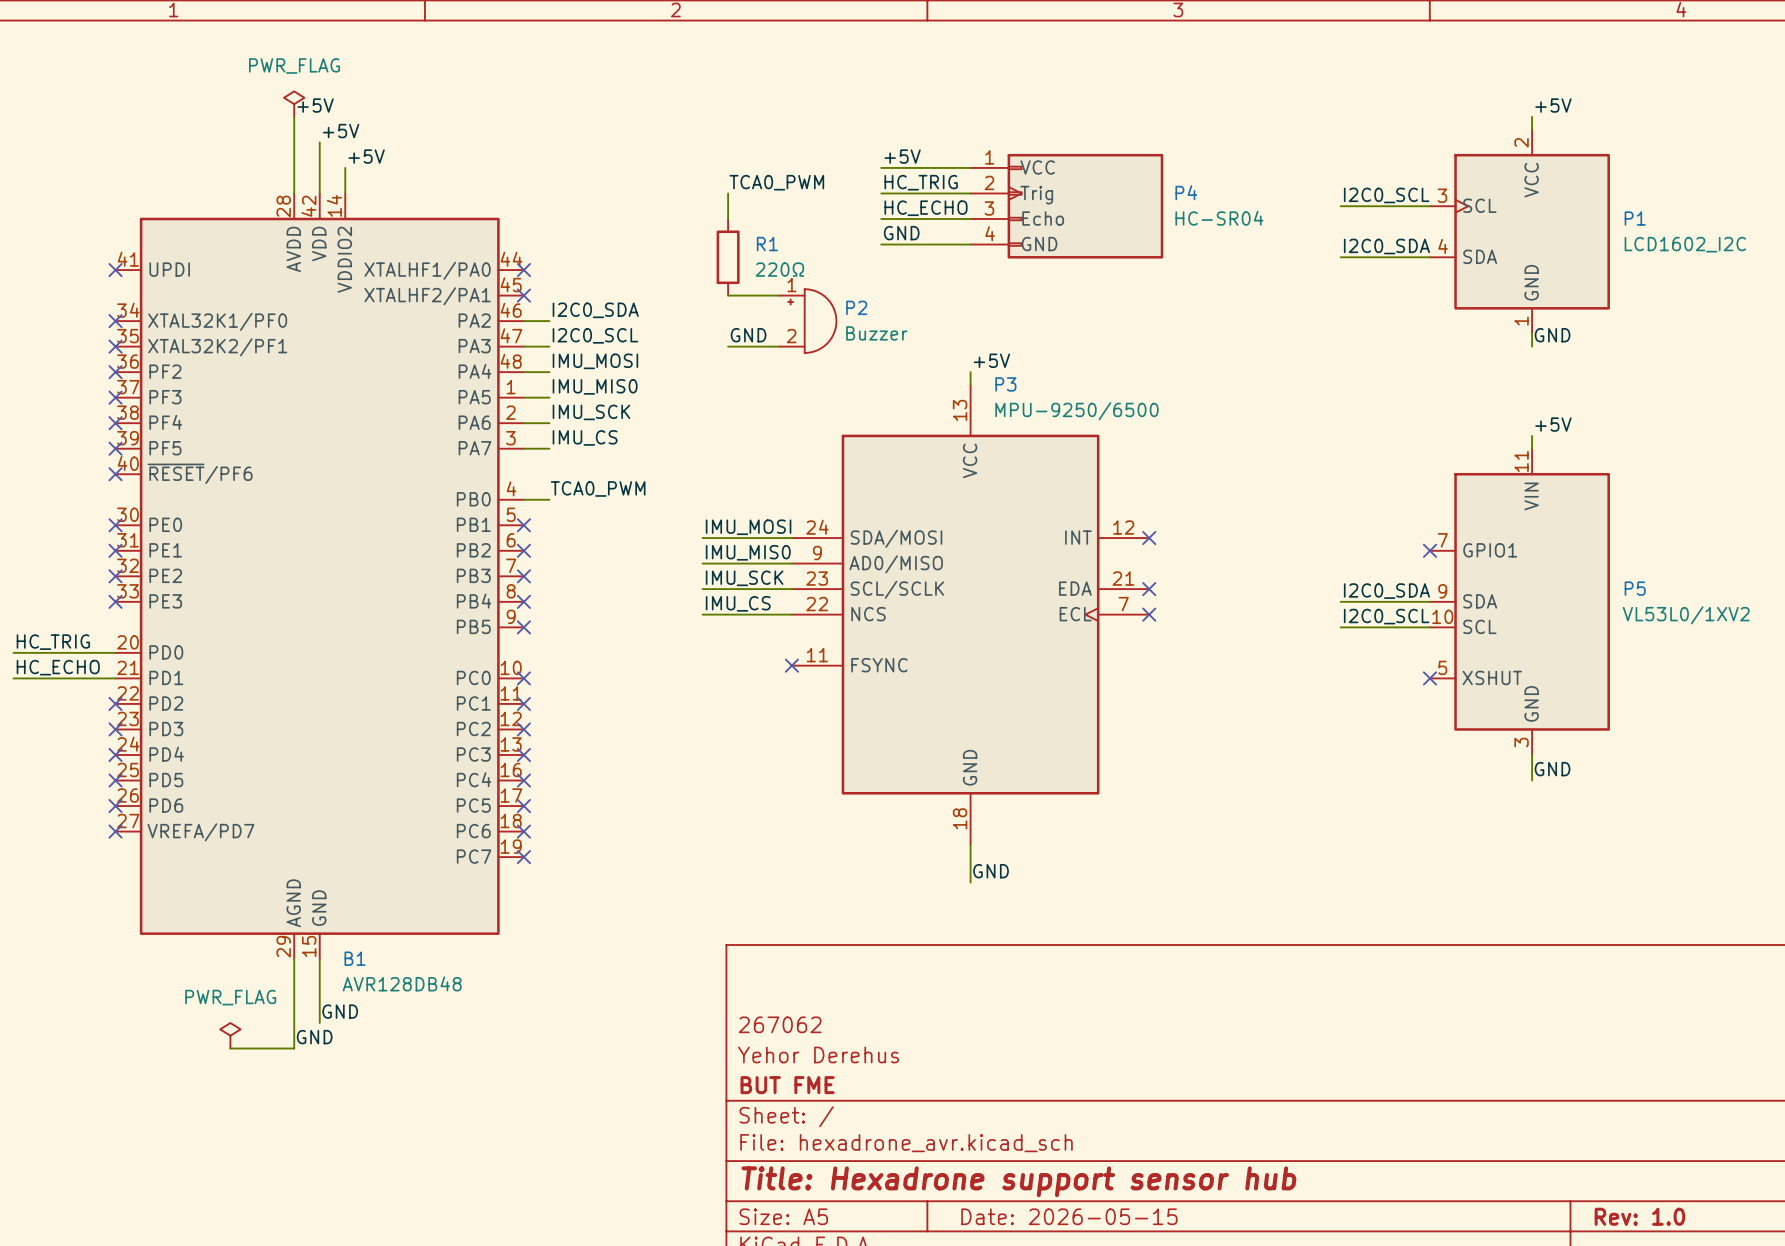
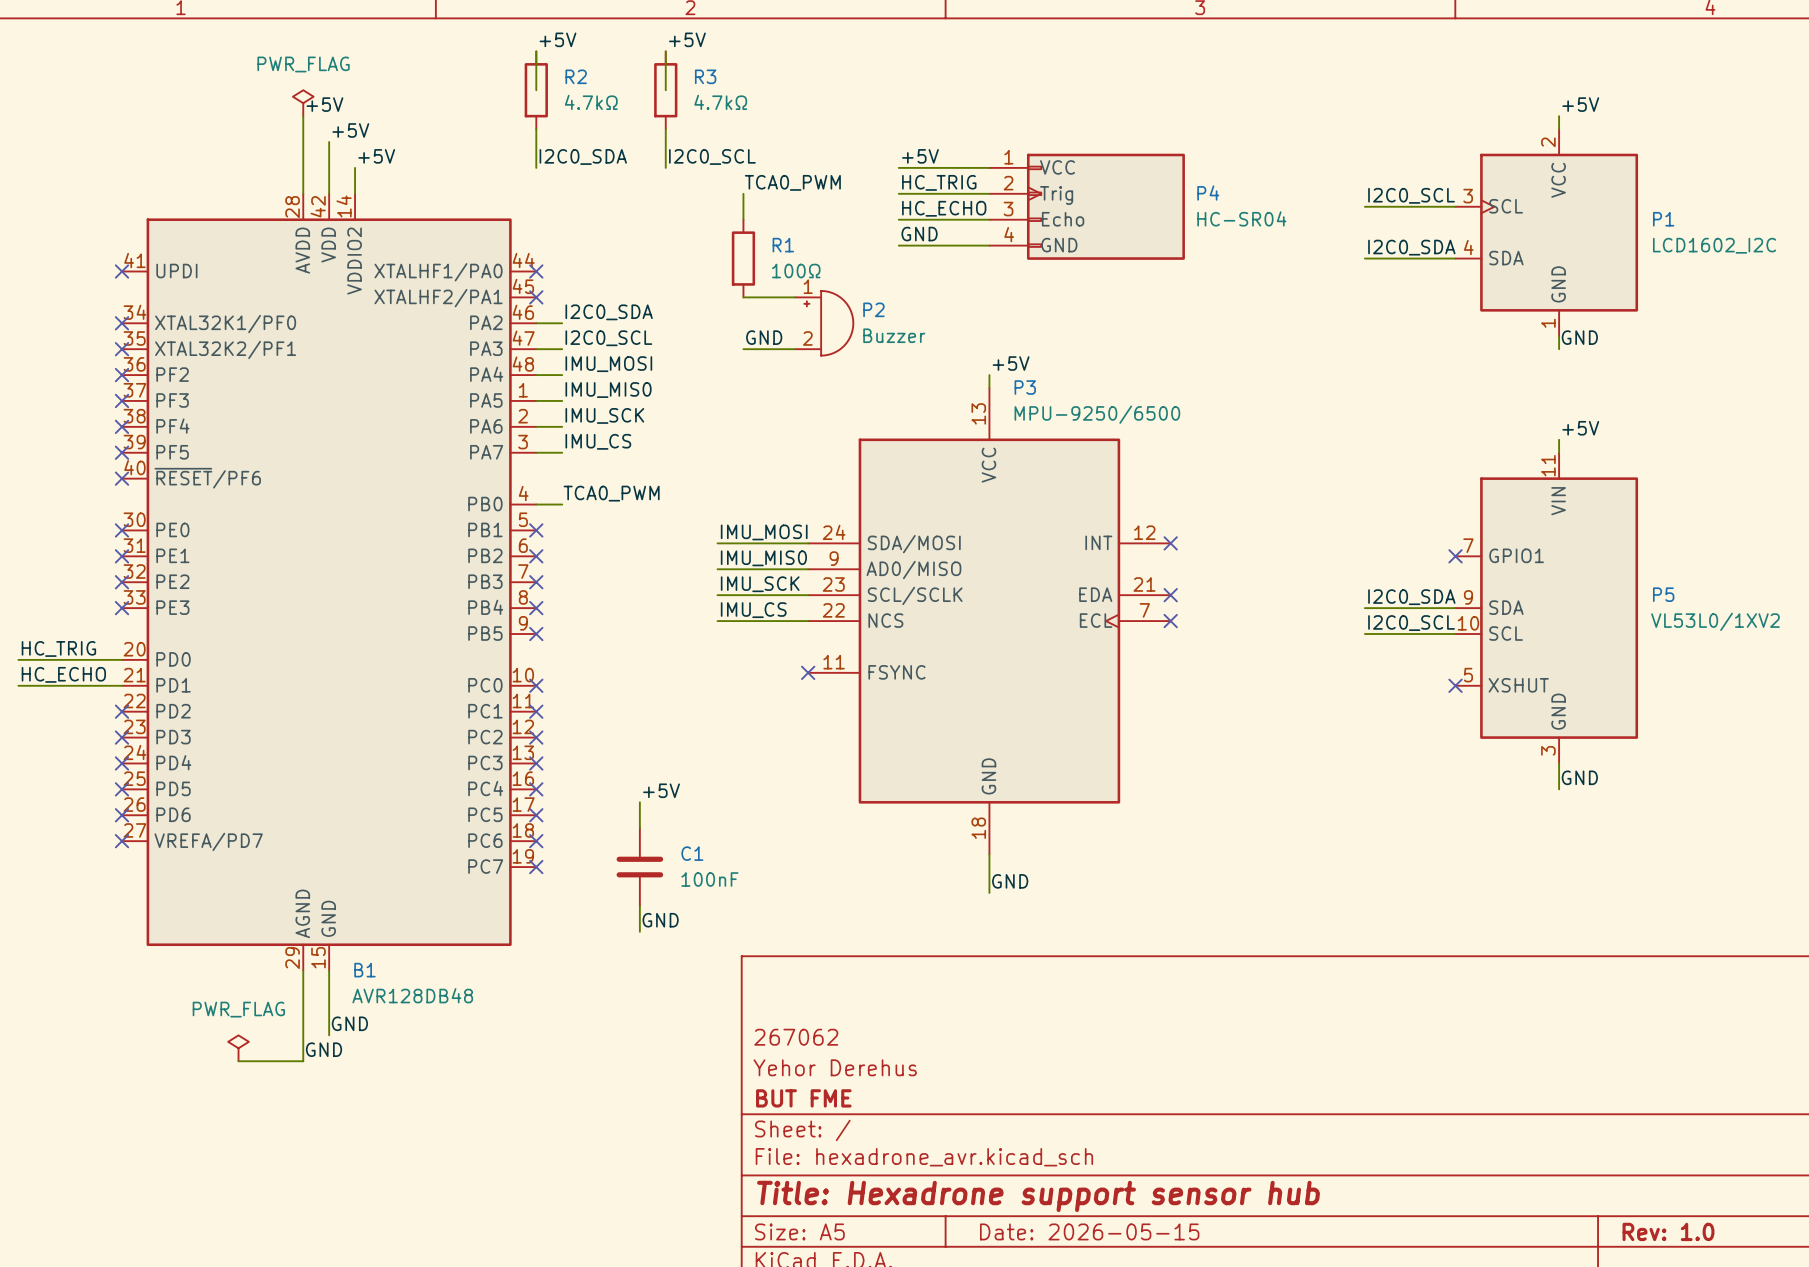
label: none -> +5V (557, 39)
label: none -> +5V (687, 39)
wire: none -> (536, 51) (536, 90)
wire: none -> (665, 51) (665, 90)
R2: none -> 4.7kΩ (536, 90)
R3: none -> 4.7kΩ (665, 90)
wire: none -> (536, 129) (536, 167)
wire: none -> (665, 129) (665, 167)
label: none -> I2C0_SDA (583, 156)
label: none -> I2C0_SCL (712, 156)
R1 value: 220Ω (779, 269) -> 100Ω (796, 271)
label: none -> +5V (661, 790)
wire: none -> (639, 802) (639, 828)
C1: none -> 100nF (639, 867)
wire: none -> (639, 905) (639, 931)
label: none -> GND (660, 920)

